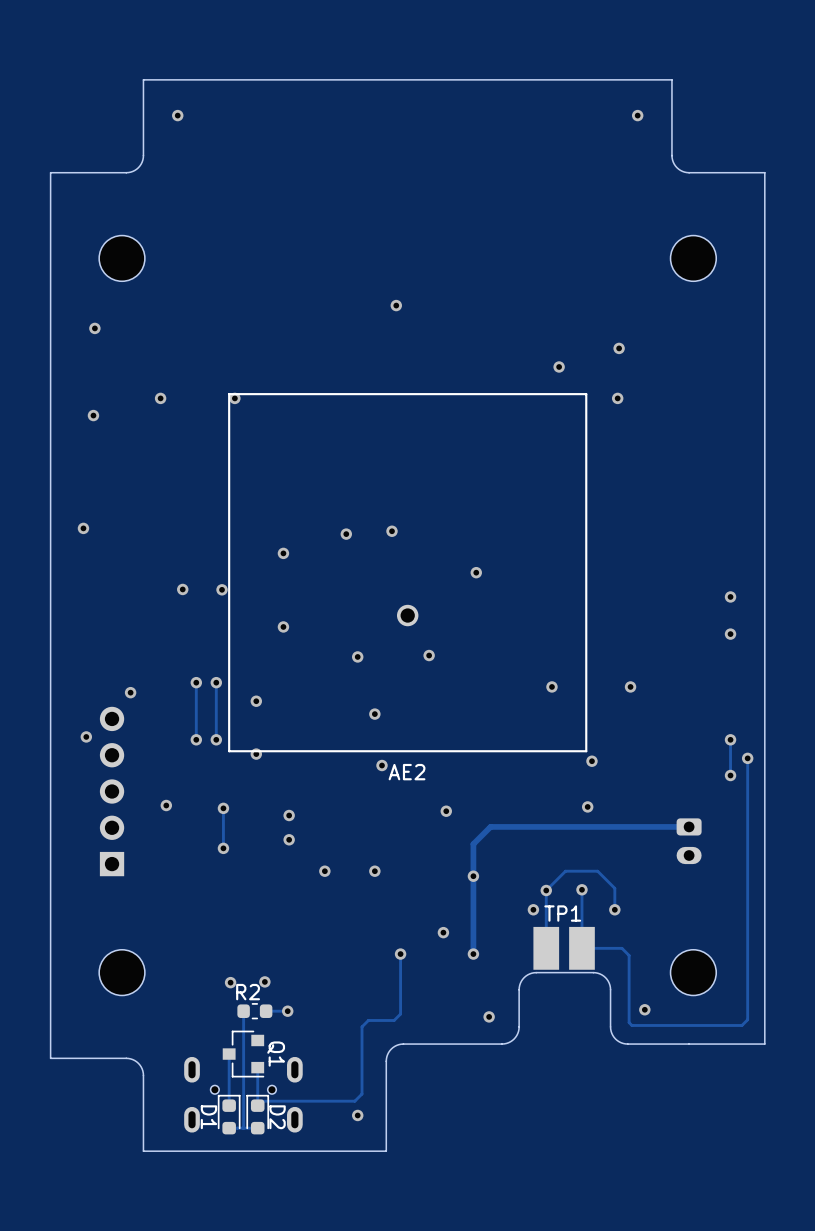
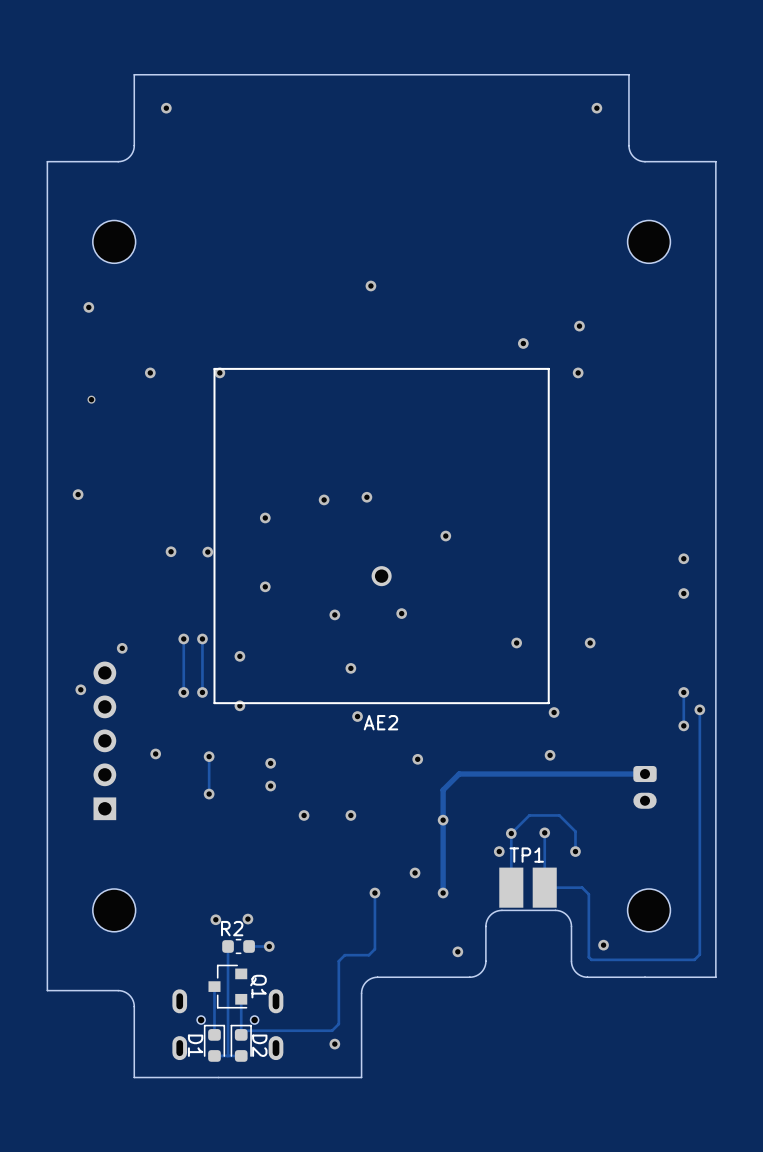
via: (93, 415) -> none
via: none -> (91, 399)

